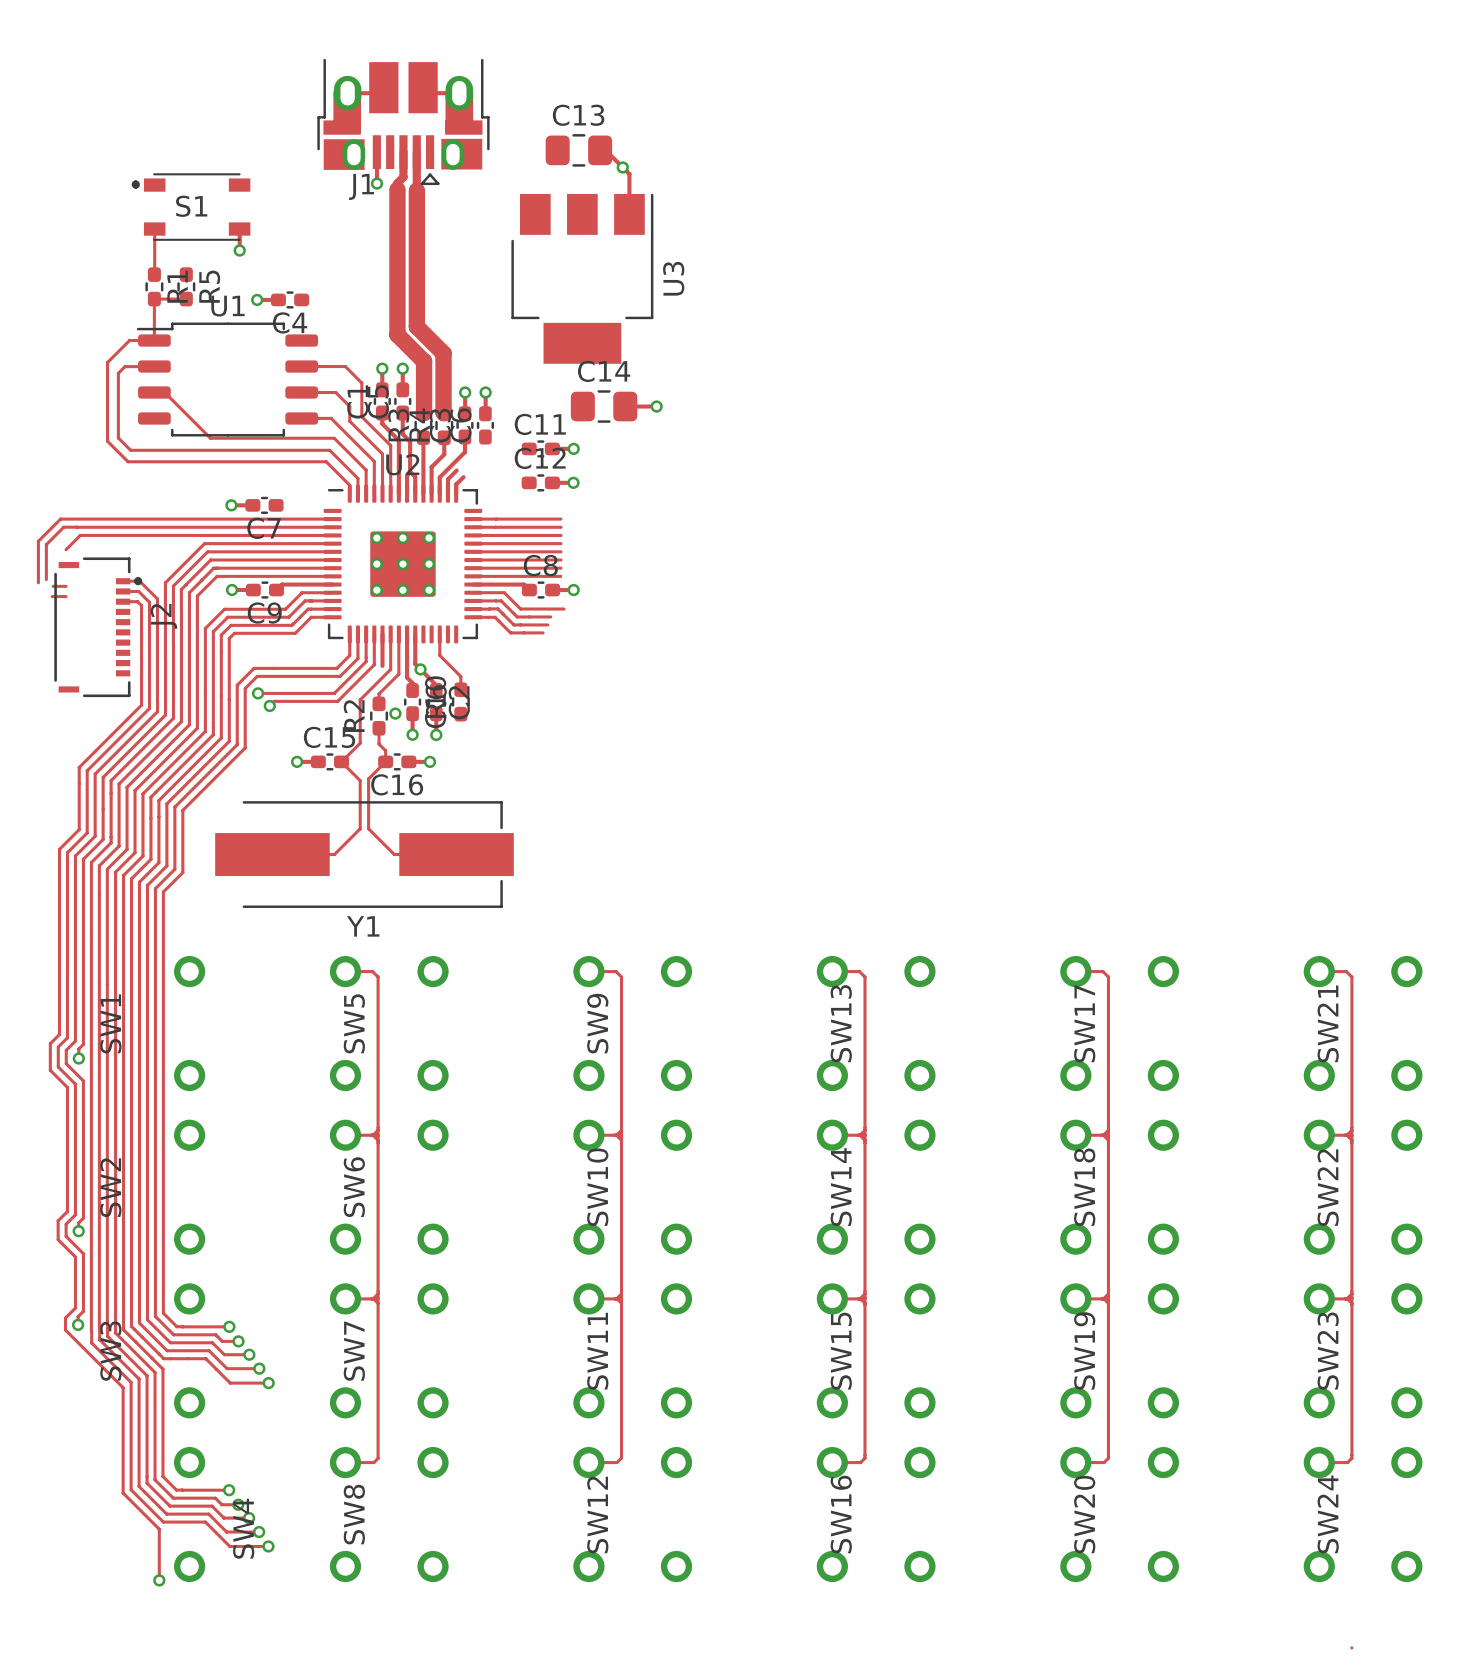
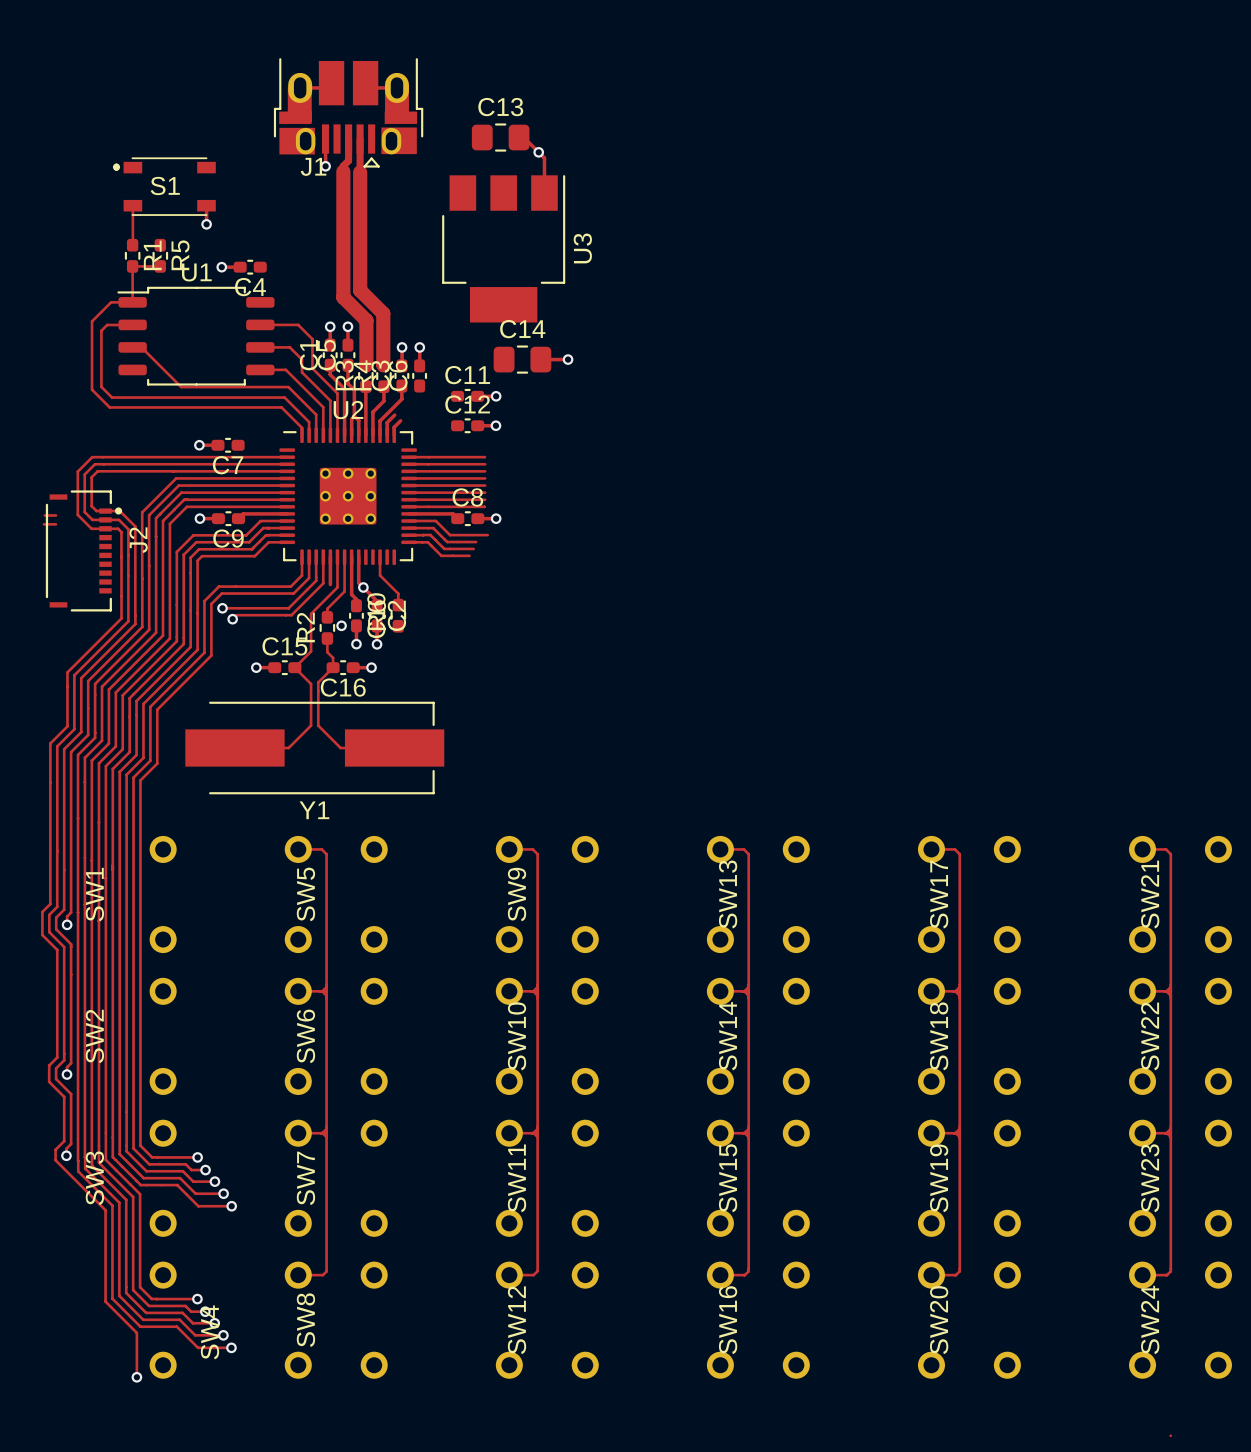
track: (107, 519) (60, 519) (38, 541) (38, 582) -> (92, 457) (77, 471) (77, 514) (91, 528) (105, 528)
track: (110, 527) (63, 527) (46, 544) (46, 579) -> (94, 464) (84, 474) (84, 512) (92, 519) (105, 519)
track: (114, 535) (80, 535) (66, 549) -> (97, 471) (91, 477) (91, 506) (96, 511) (105, 511)

